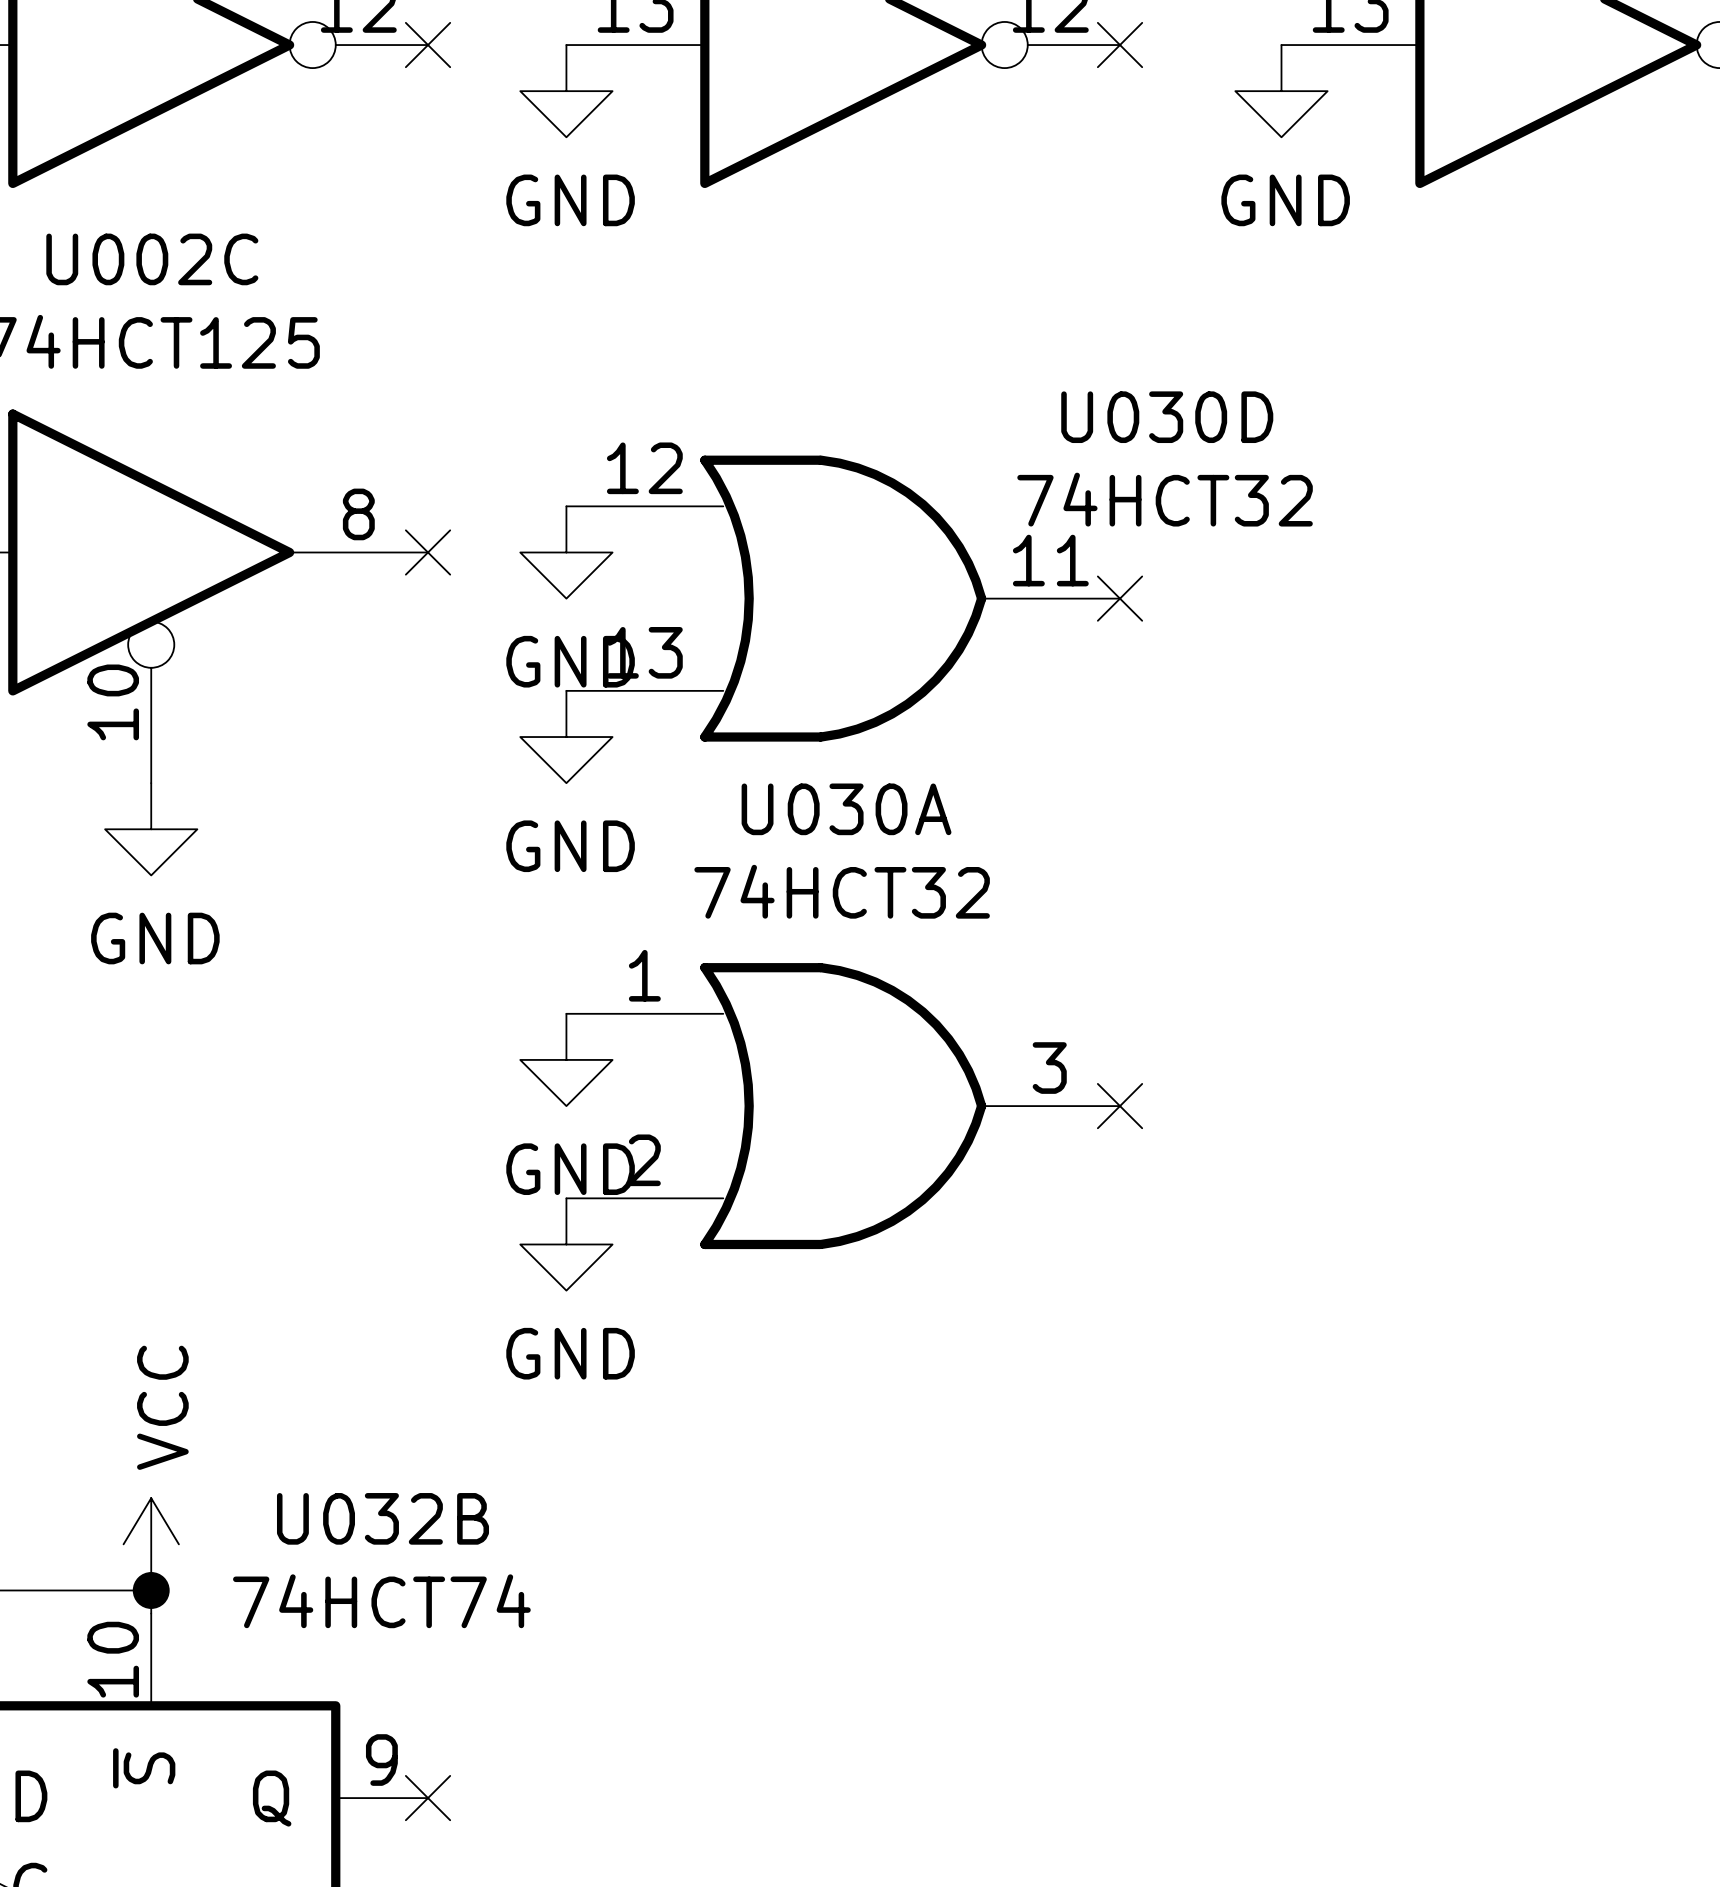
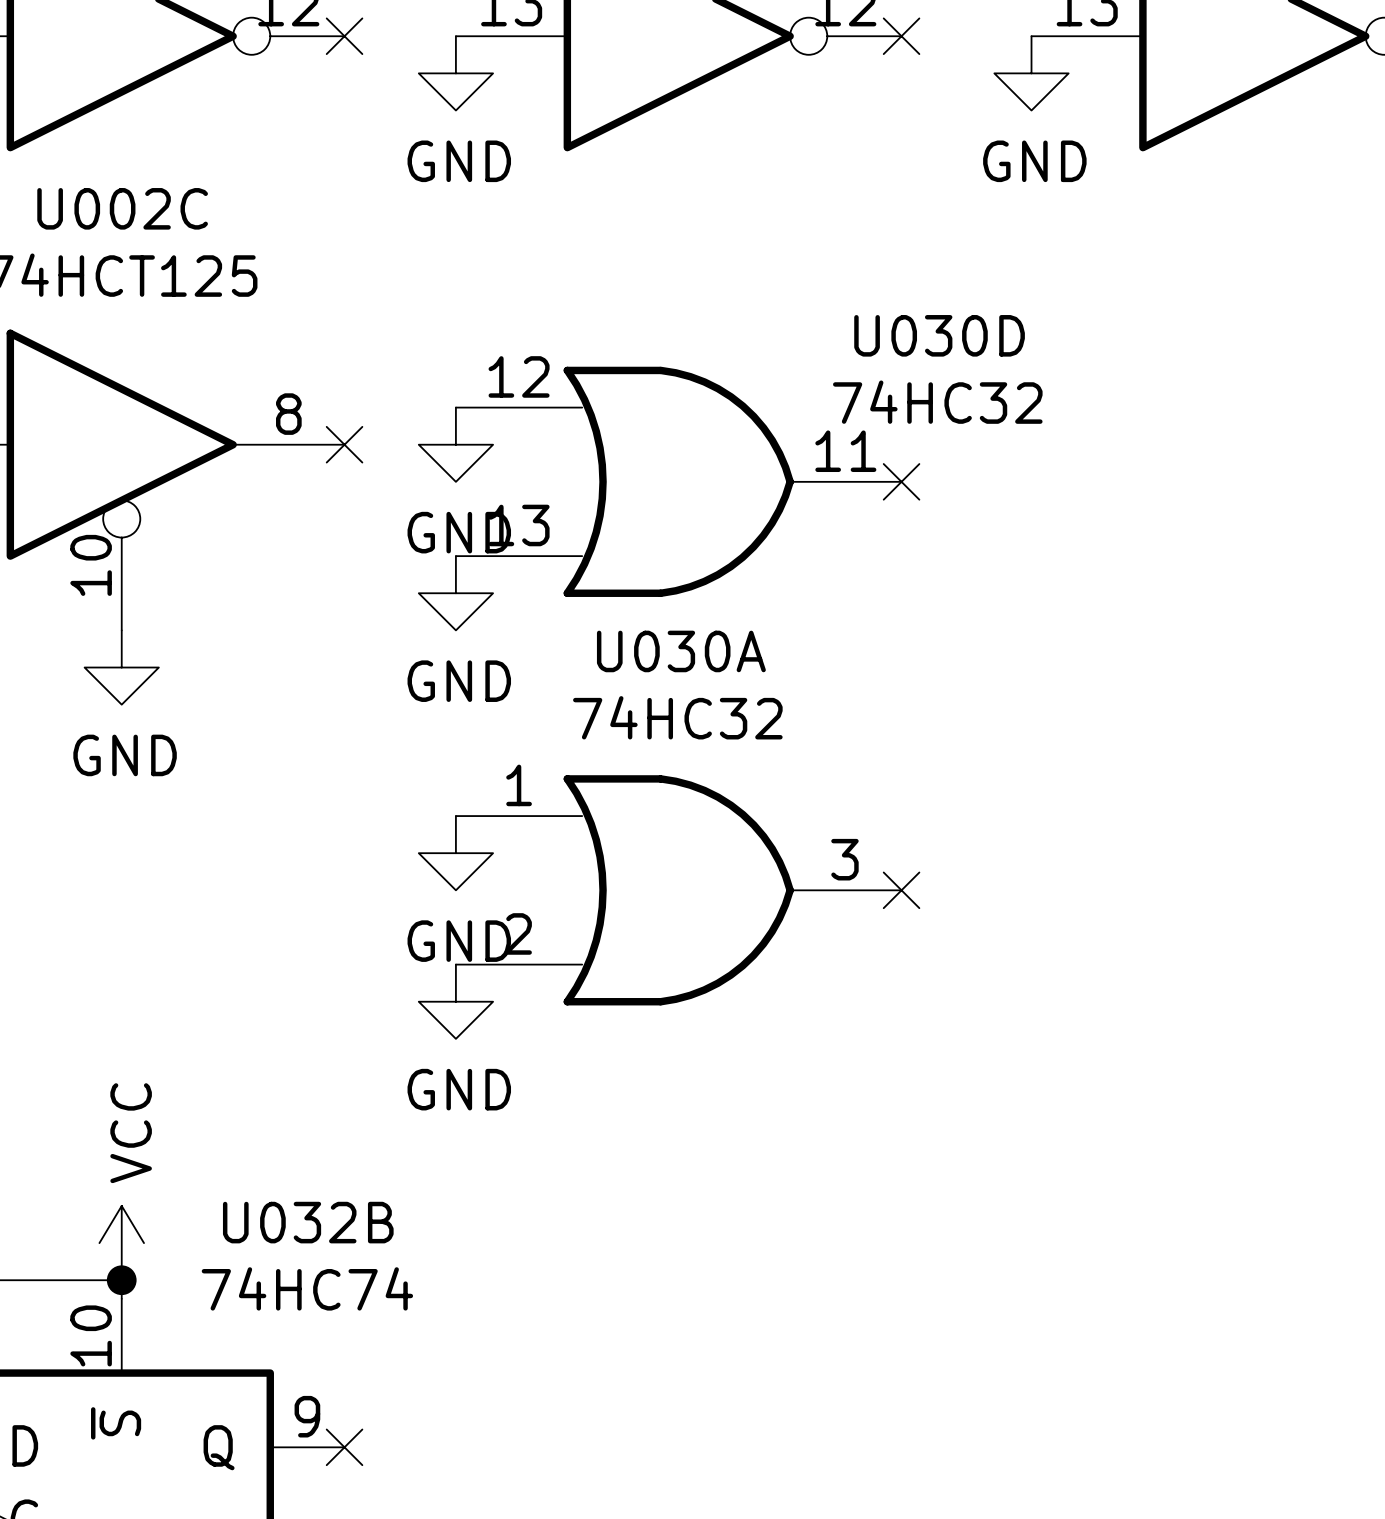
U030D value: 74HCT32 (1165, 499) -> 74HC32 (937, 402)
U030A value: 74HCT32 (842, 891) -> 74HC32 (677, 717)
U032B value: 74HCT74 (381, 1601) -> 74HC74 (307, 1288)

